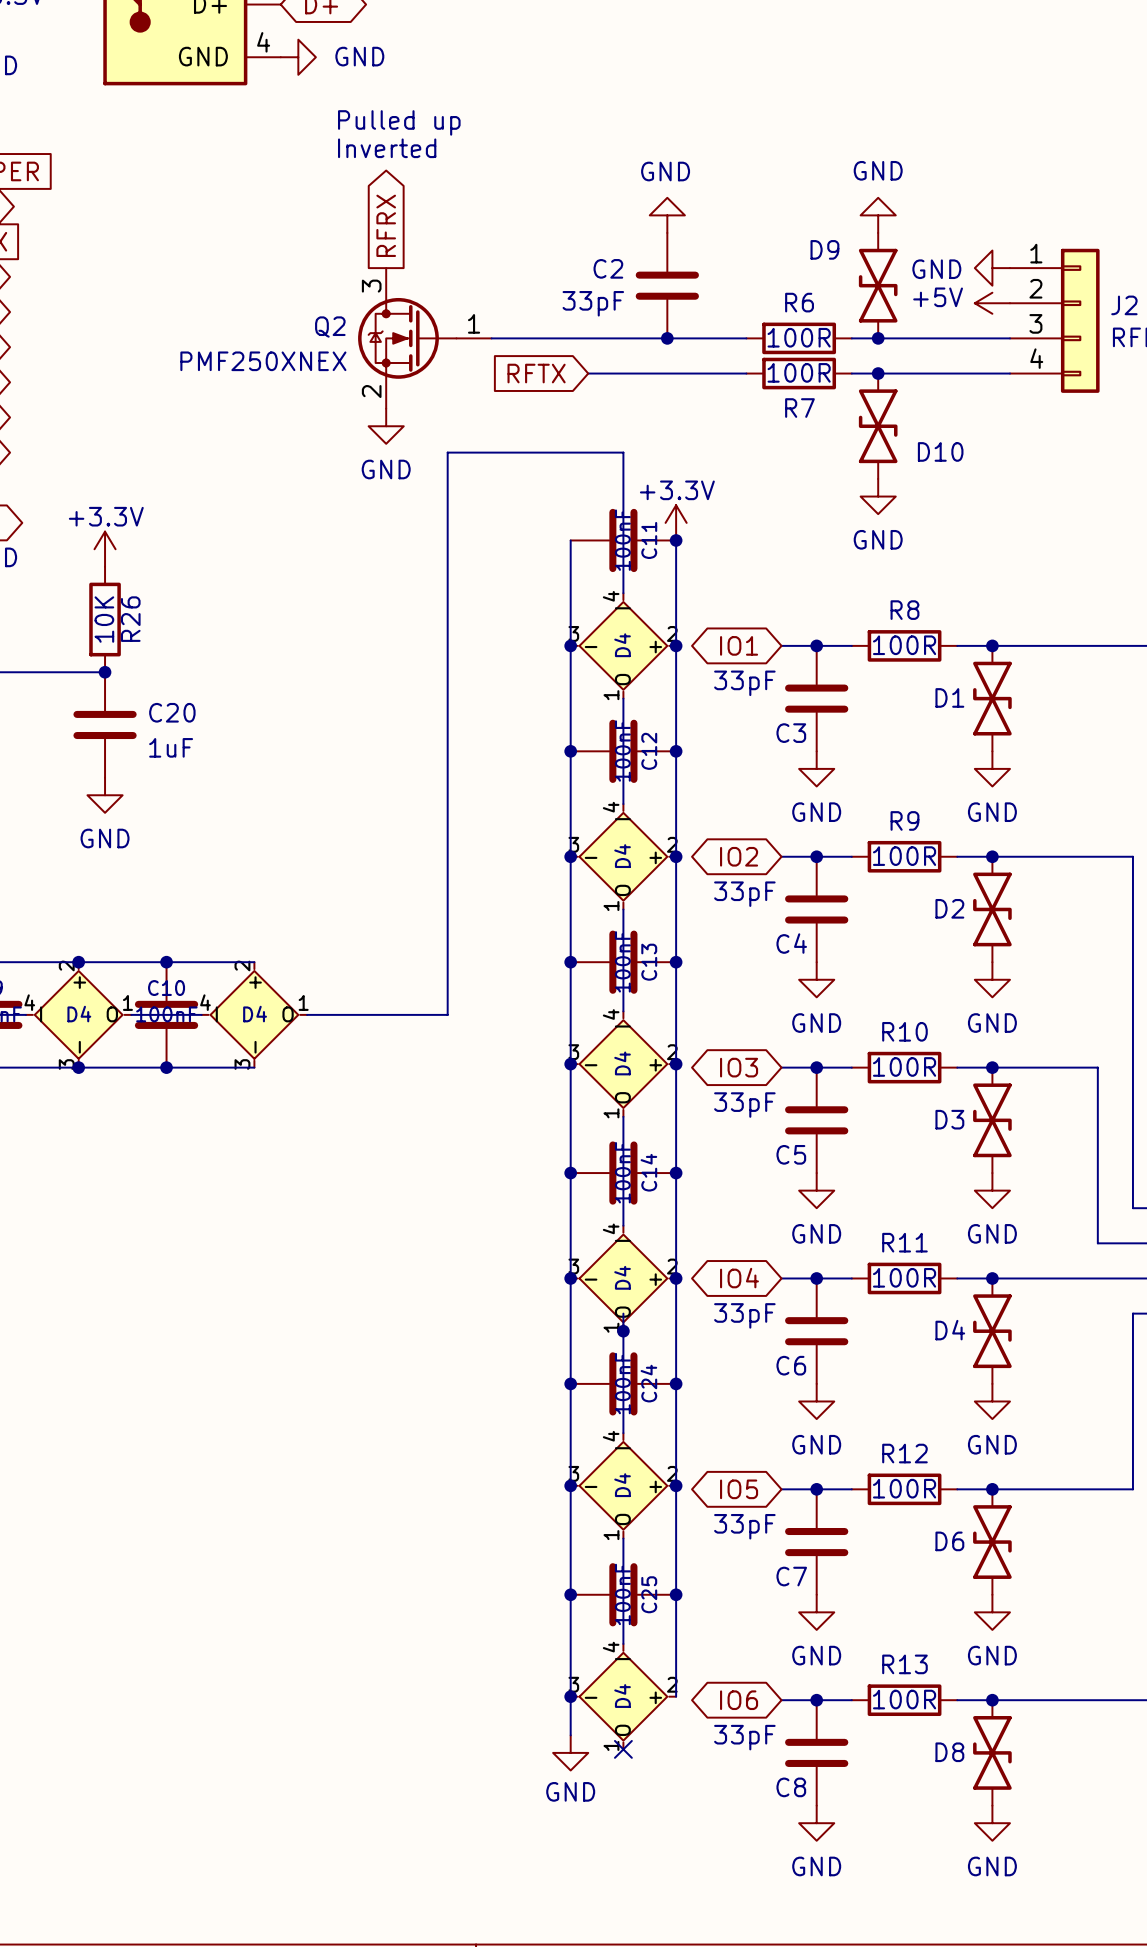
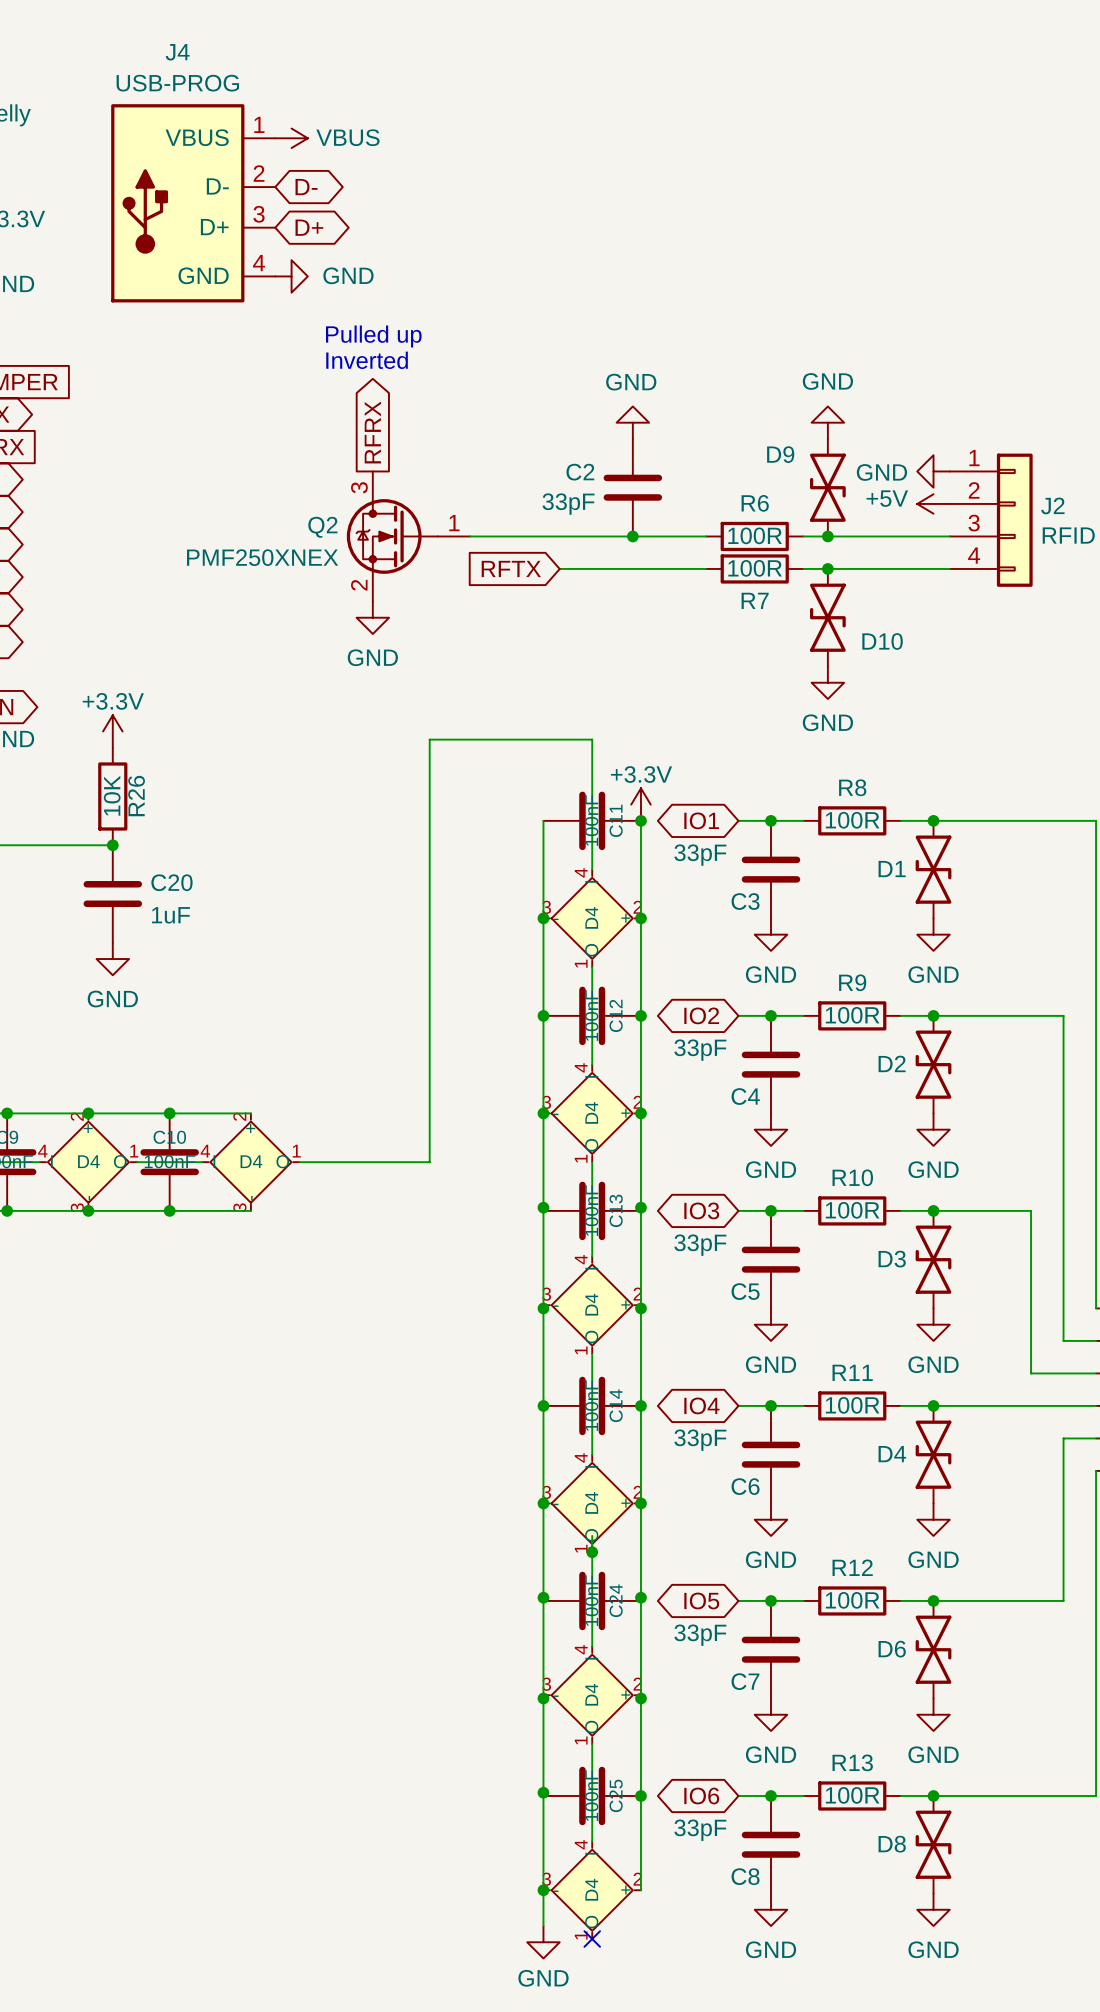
power symbol position: +3.3V (676, 522) -> +3.3V (640, 804)
wire: (570, 540) (570, 645) -> none
C11 position: (623, 540) -> (592, 820)
wire: (676, 540) (676, 645) -> none
junction: (676, 540) -> none
wire: (447, 558) (447, 452) (623, 452) (623, 558) -> (429, 739) (592, 739)
junction: (570, 645) -> none
D4: (623, 645) -> none
C12 position: (623, 751) -> (592, 1015)
D4: none -> (592, 918)
D4: (623, 856) -> none
C13 position: (623, 962) -> (592, 1210)
D4: none -> (592, 1113)
D4: (623, 1064) -> none
D4: none -> (592, 1305)
C14 position: (623, 1173) -> (592, 1405)
D4: (623, 1278) -> none
junction: (623, 1331) -> none
C24 position: (623, 1383) -> (592, 1600)
D4: none -> (592, 1503)
junction: none -> (592, 1552)
D4: (623, 1485) -> none
D4: none -> (592, 1695)
C25 position: (623, 1594) -> (592, 1796)
D4: (623, 1696) -> none
wire: none -> (640, 1792) (640, 1890)
junction: none -> (640, 1796)
wire: none -> (543, 1828) (543, 1926)
no-connect mark: (623, 1749) -> none
power symbol position: GND (570, 1752) -> GND (543, 1942)
junction: none -> (543, 1890)
D4: none -> (592, 1890)
no-connect mark: none -> (592, 1939)

